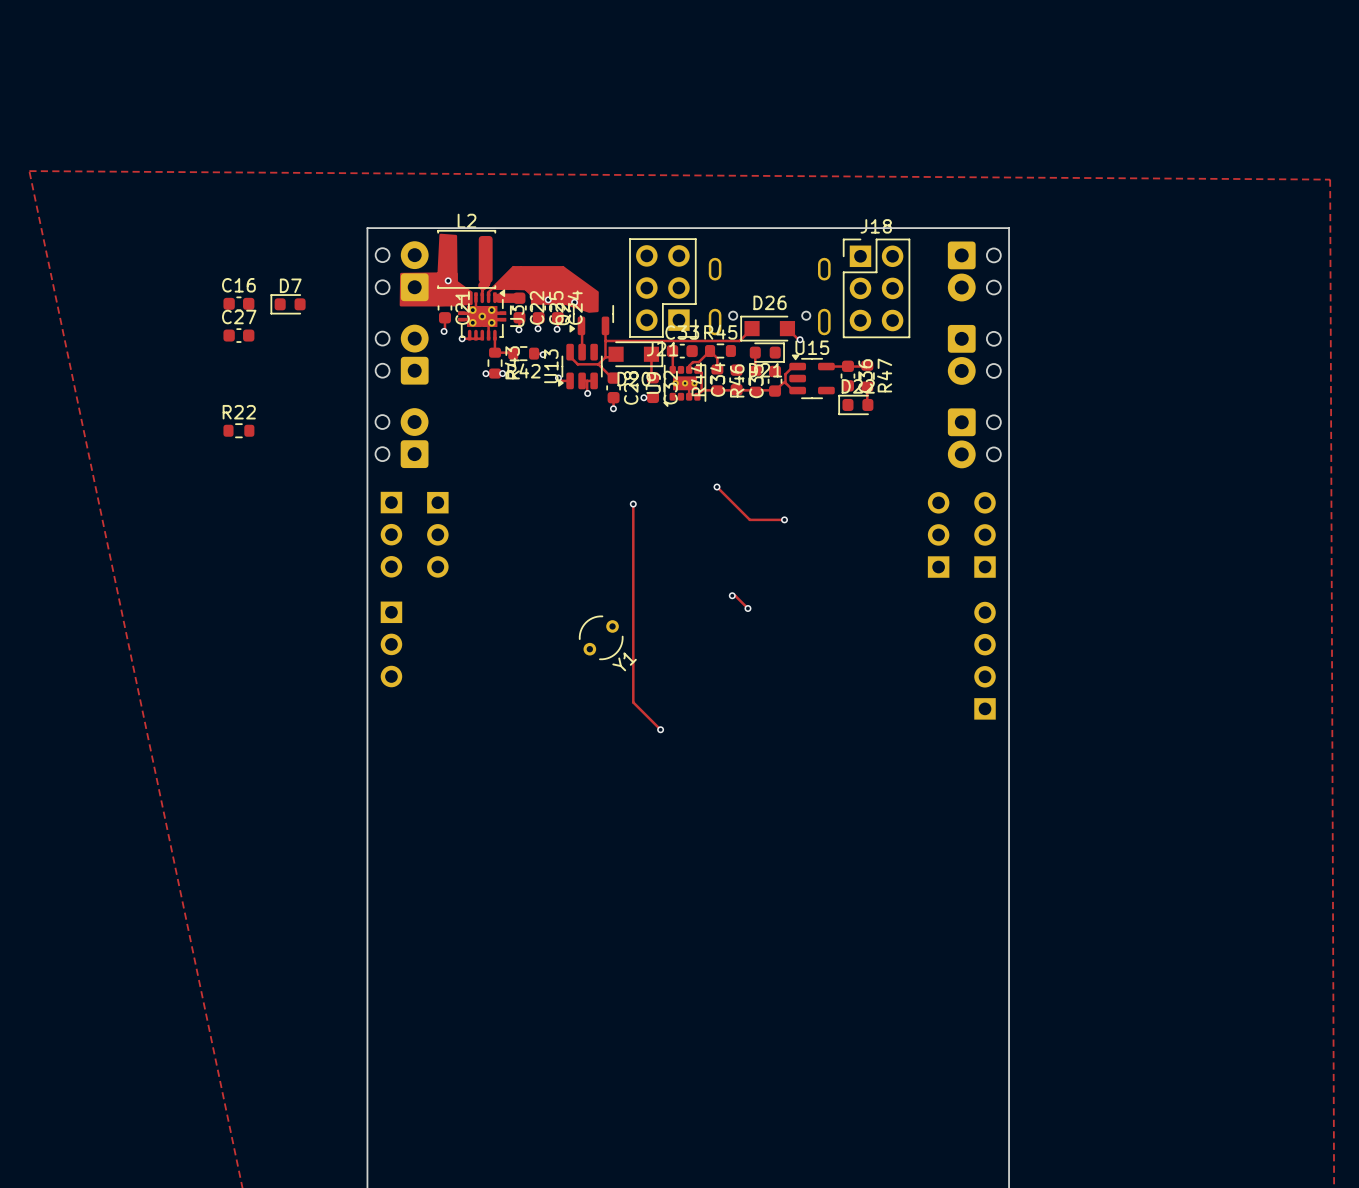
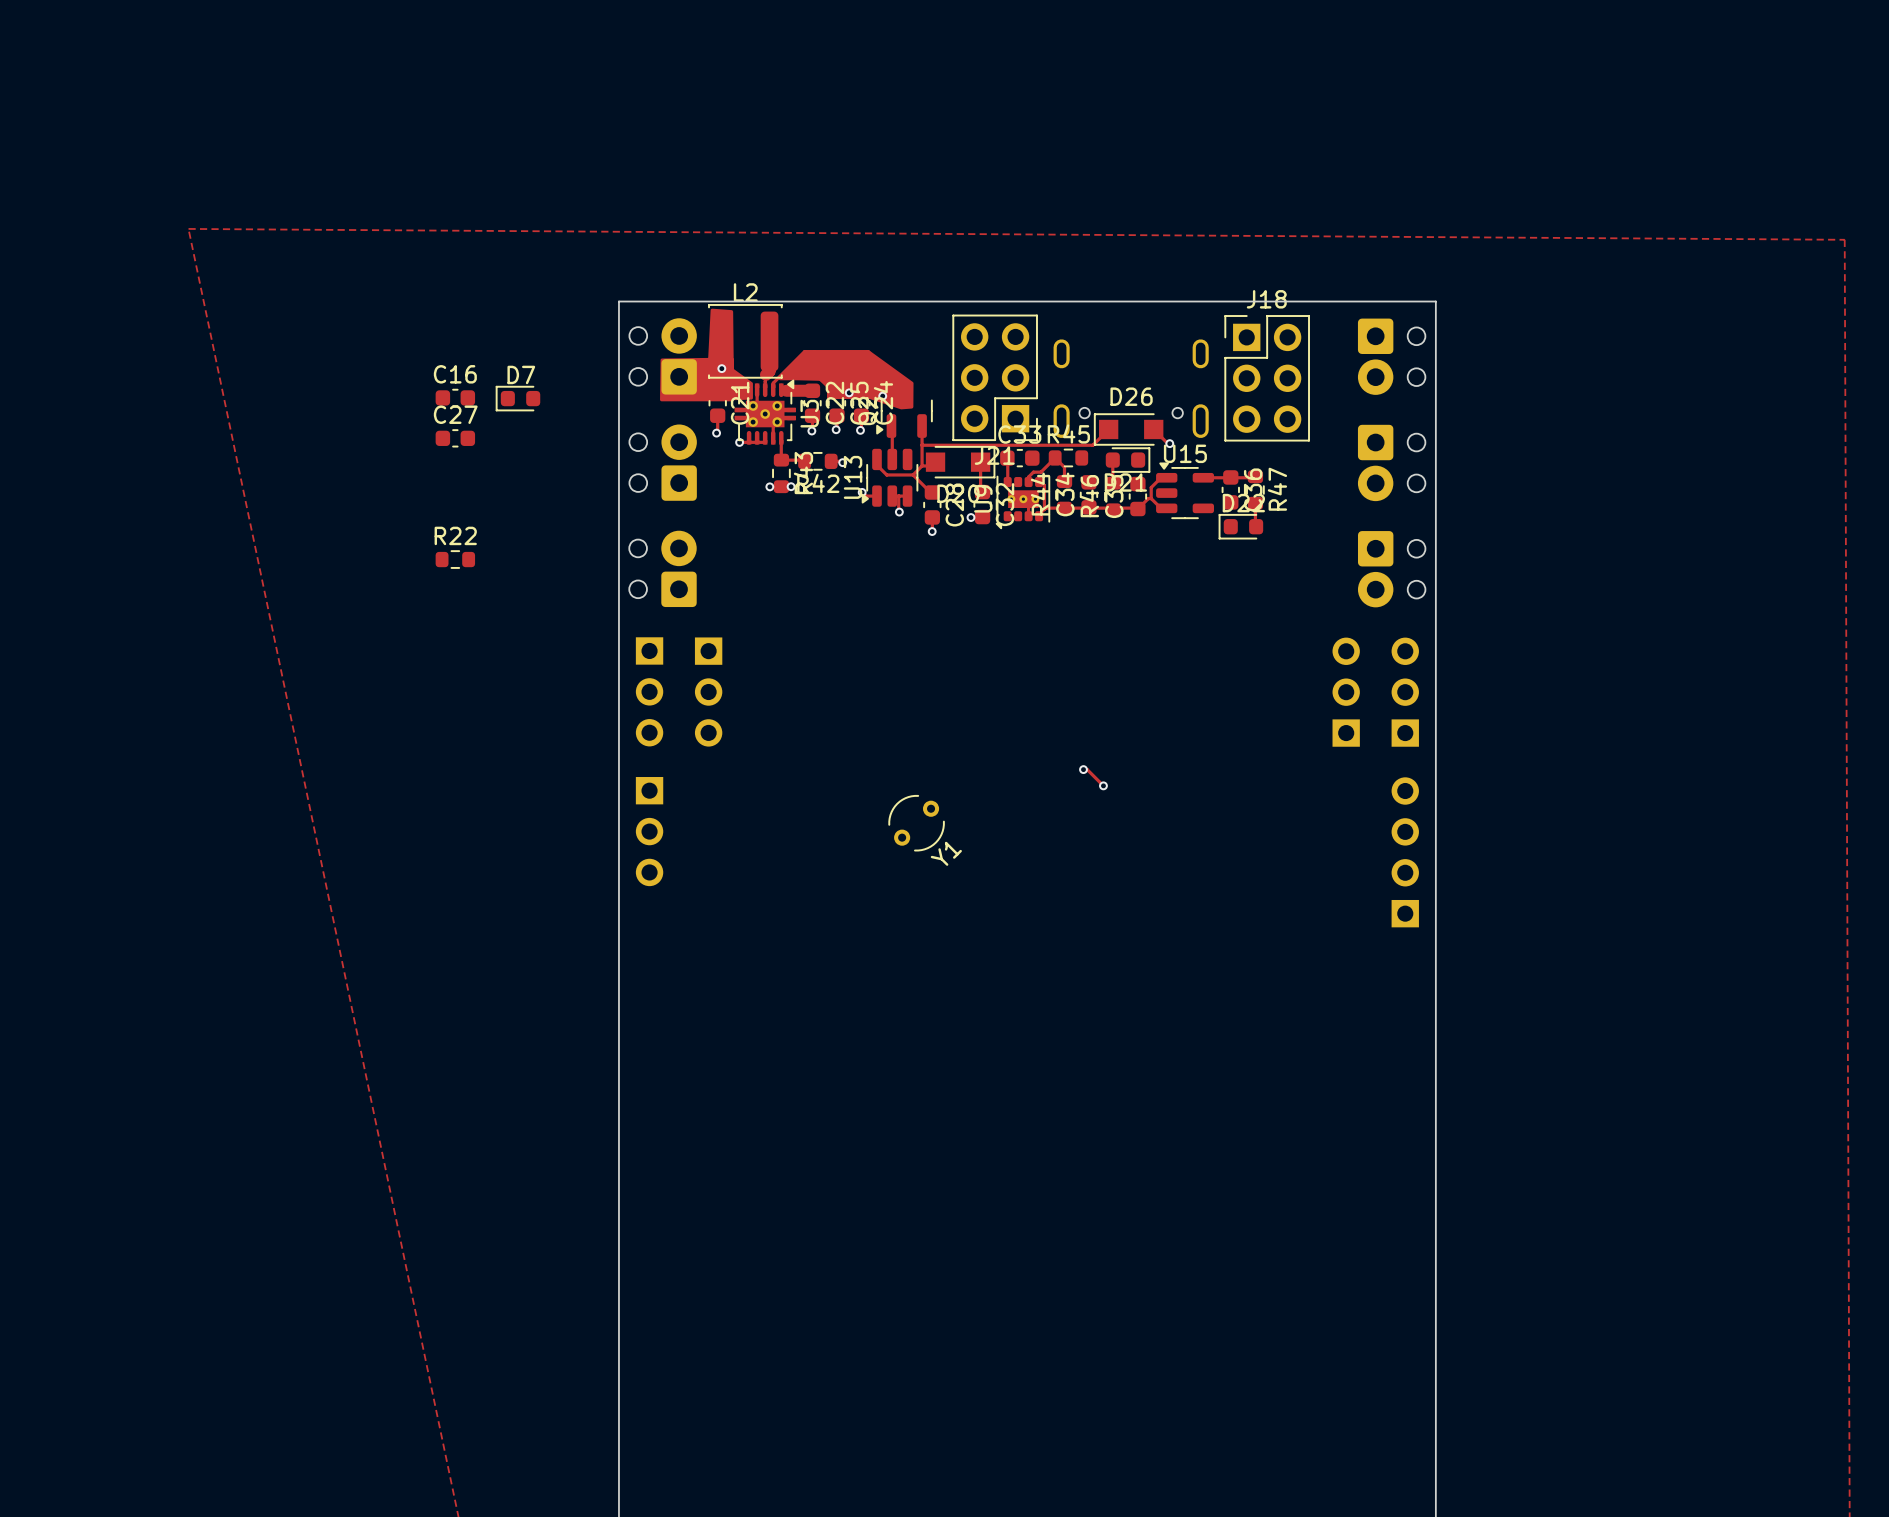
track: (716, 487) (749, 519) (784, 519) -> none
via: (716, 487) -> none
track: (633, 504) (633, 702) (660, 729) -> none
via: (633, 504) -> none
via: (784, 519) -> none
via: (660, 729) -> none

